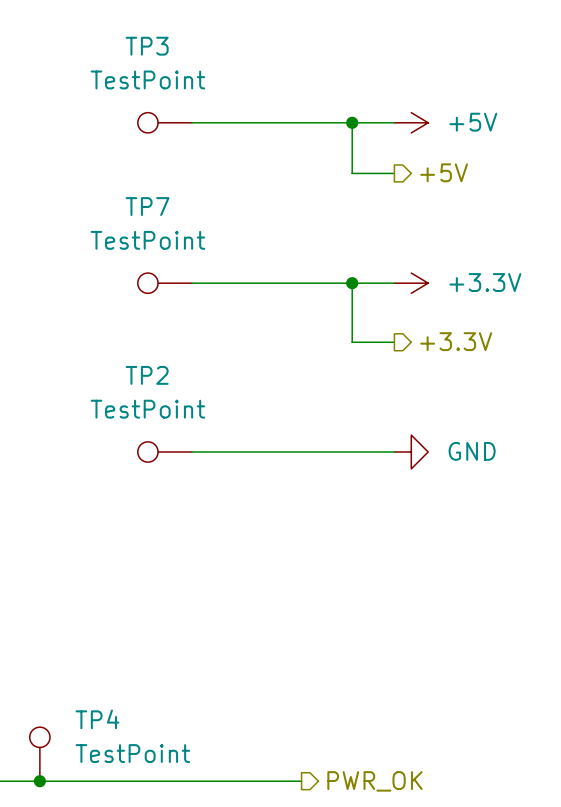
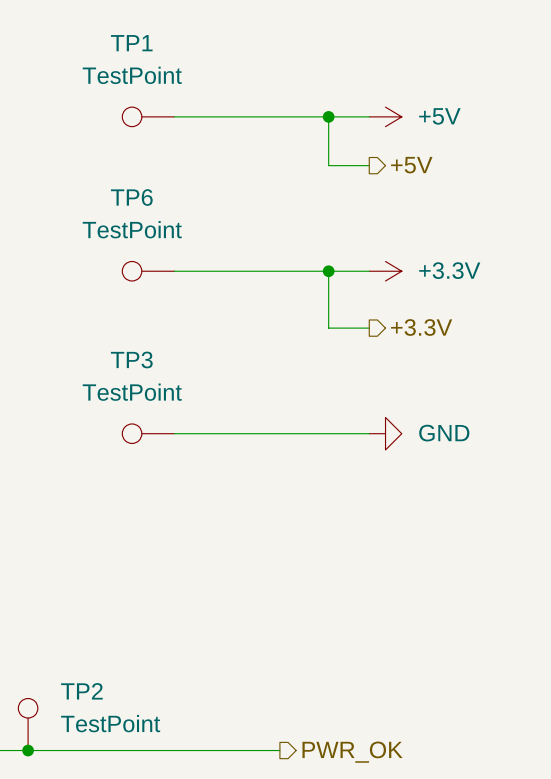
TP3 name: TP3 (147, 46) -> TP1 (131, 43)
TP7 name: TP7 (147, 206) -> TP6 (131, 197)
TP2 name: TP2 (147, 375) -> TP3 (131, 359)
TP4 name: TP4 (97, 719) -> TP2 (81, 691)

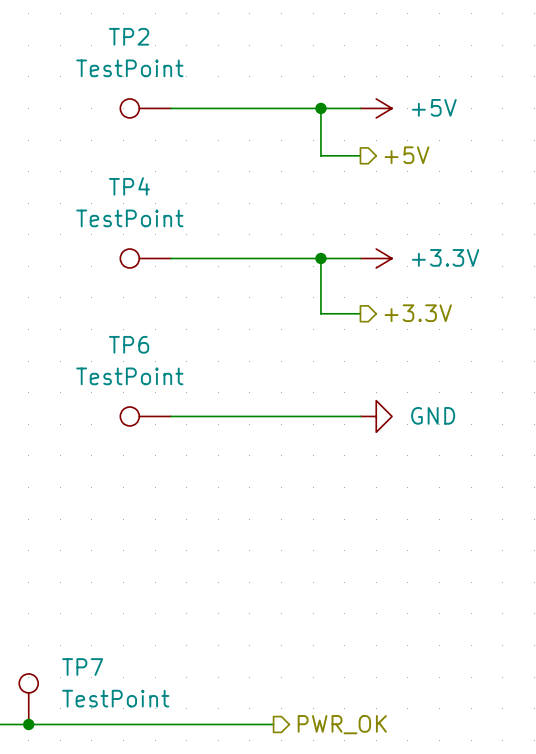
TP1 name: TP1 (131, 43) -> TP2 (129, 36)
TP6 name: TP6 (131, 197) -> TP4 (129, 186)
TP3 name: TP3 (131, 359) -> TP6 (129, 344)
TP2 name: TP2 (81, 691) -> TP7 (82, 667)

